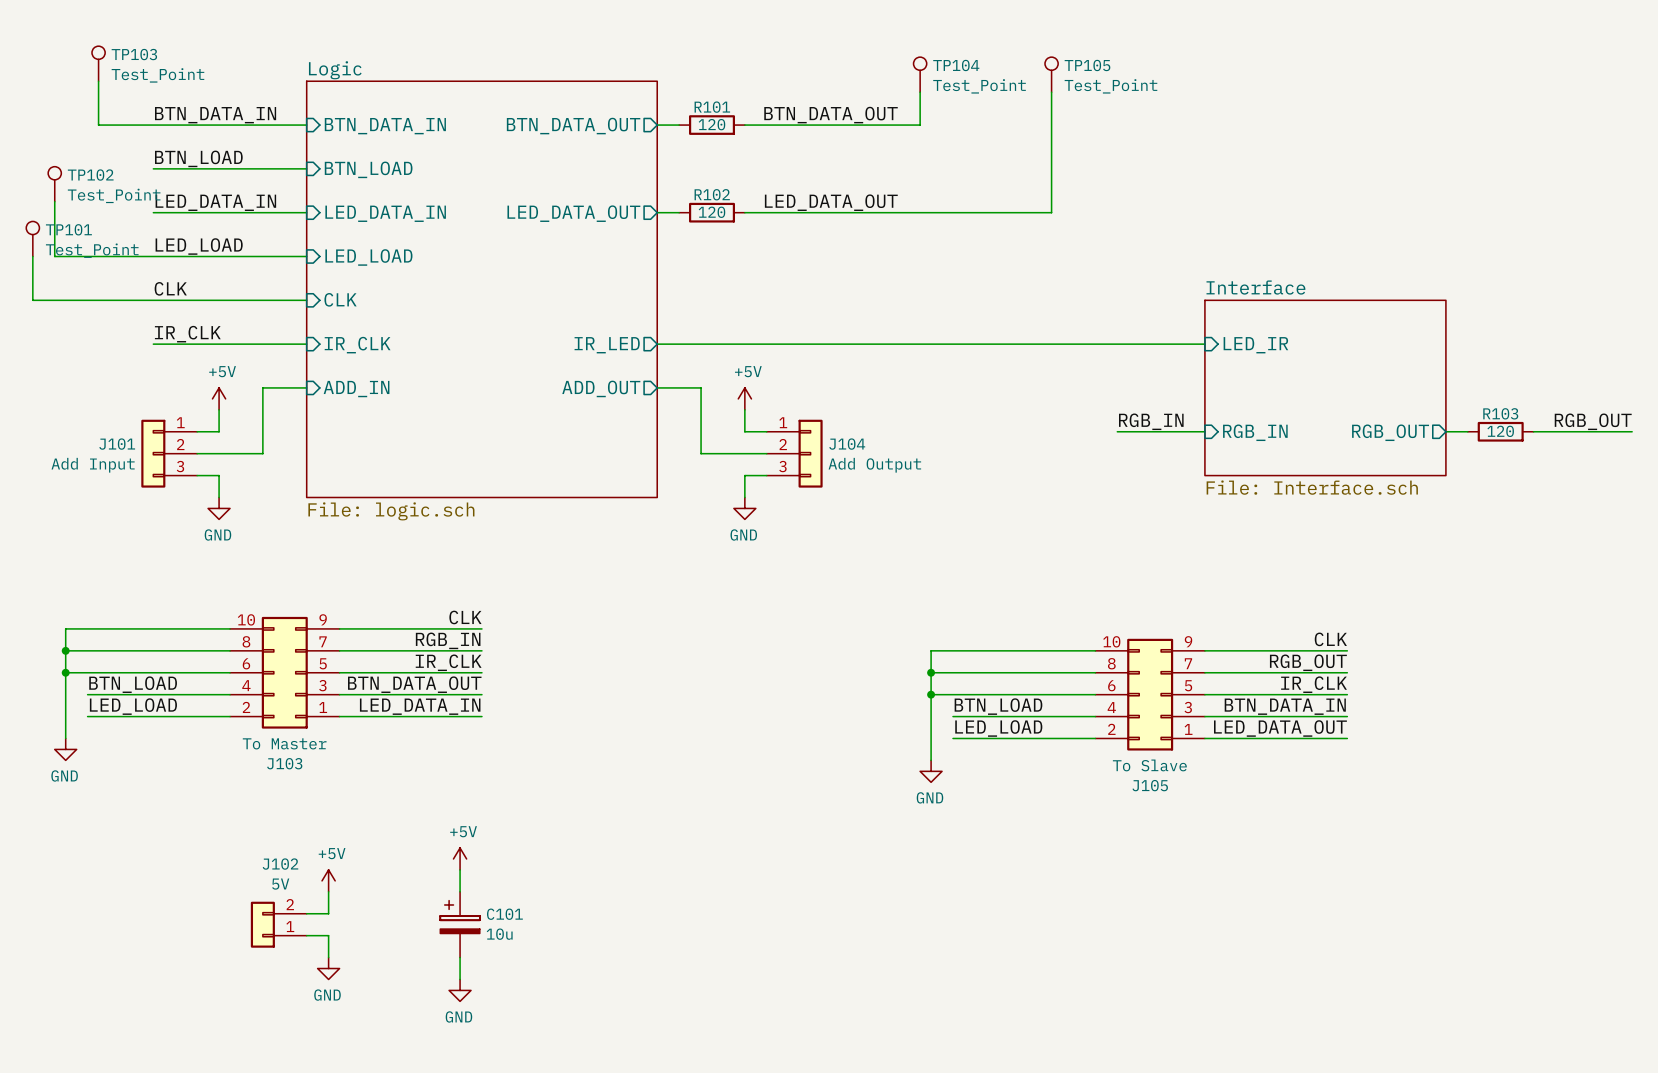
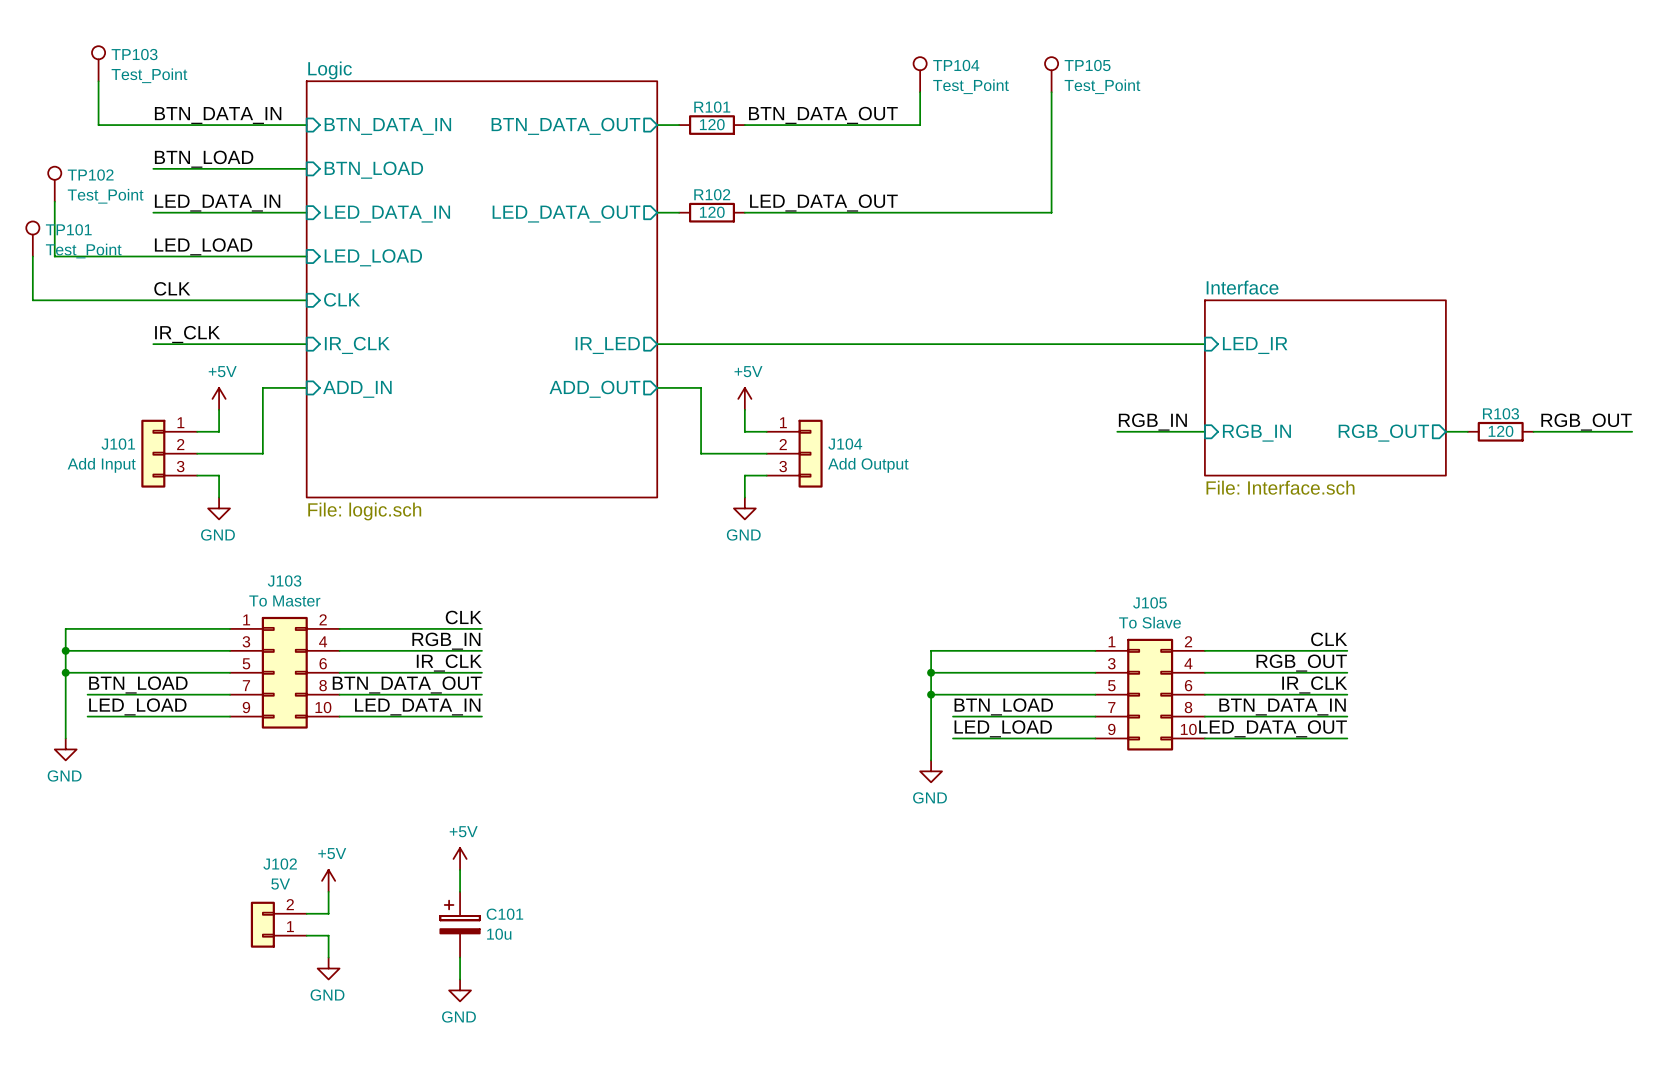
J103 rotation: 0° (284, 672) -> 180° (284, 672)
J105 rotation: 0° (1150, 694) -> 180° (1150, 694)

